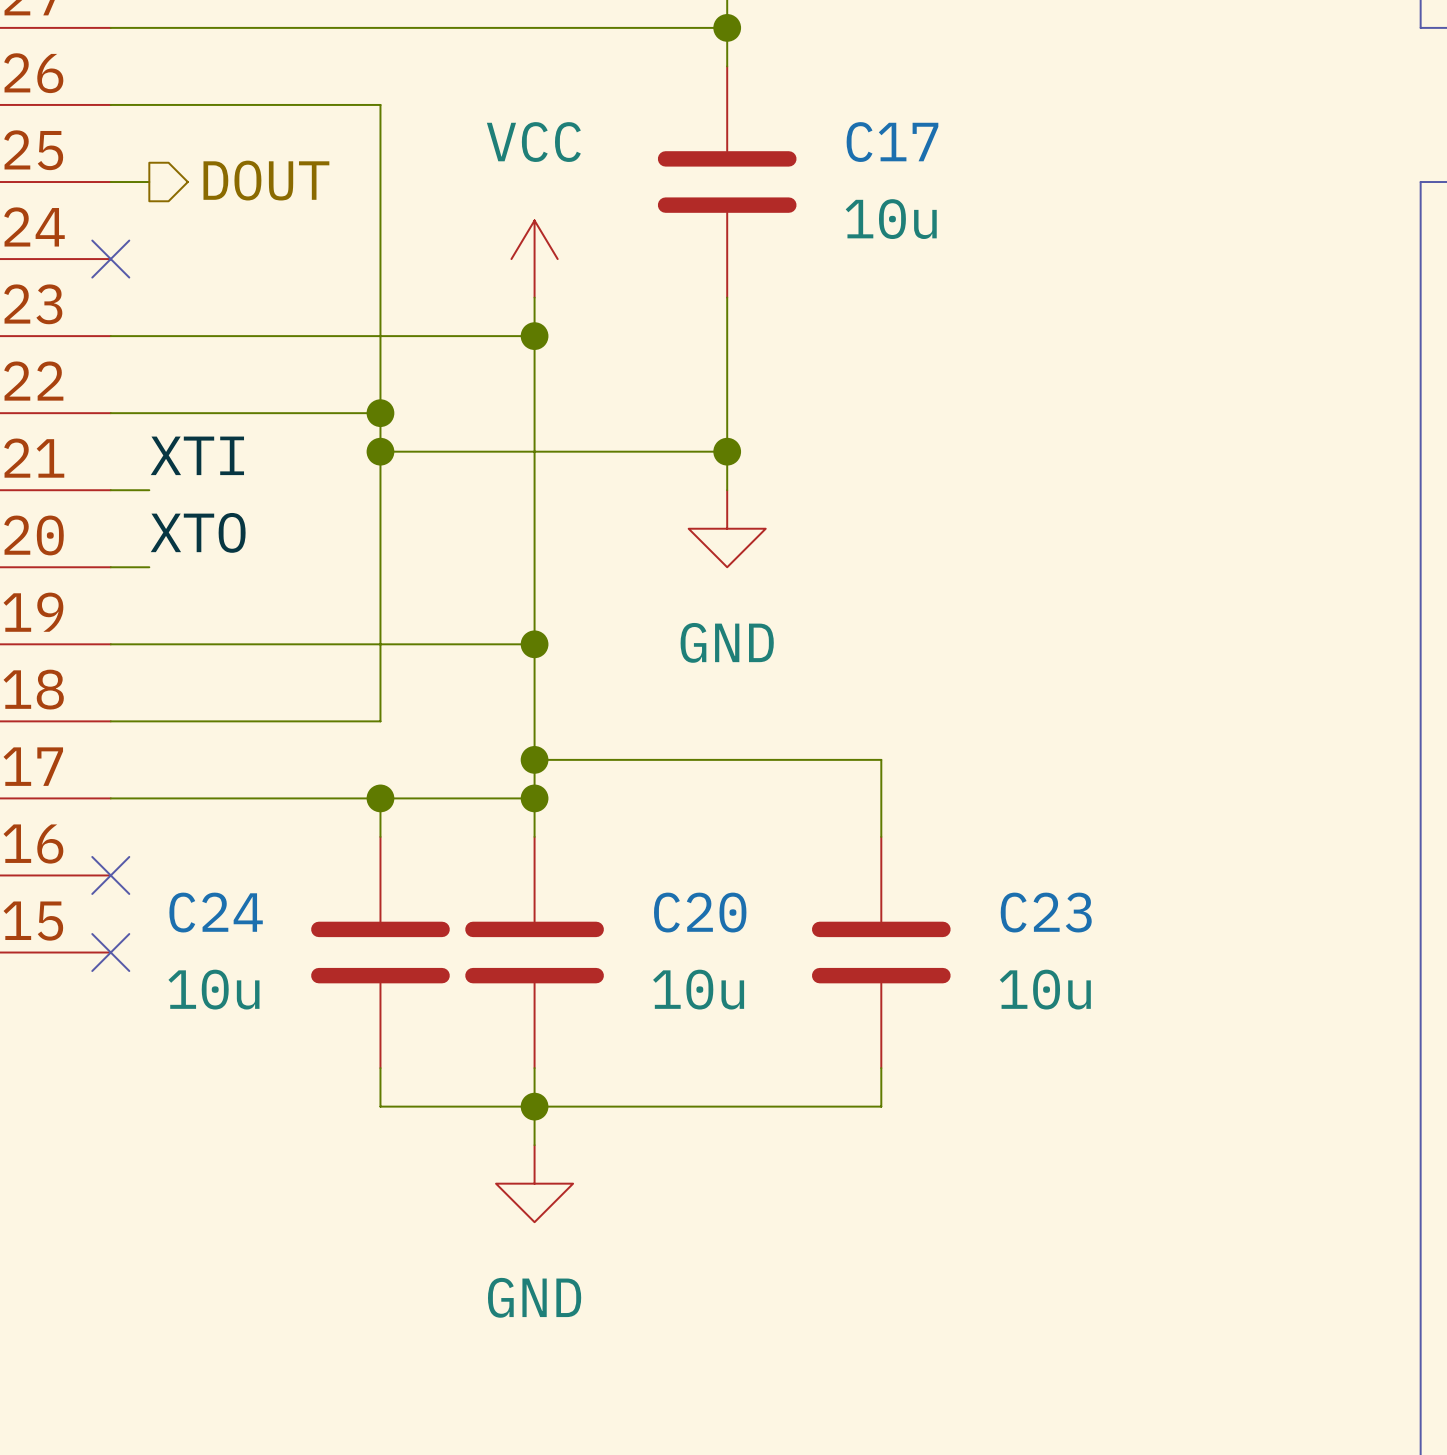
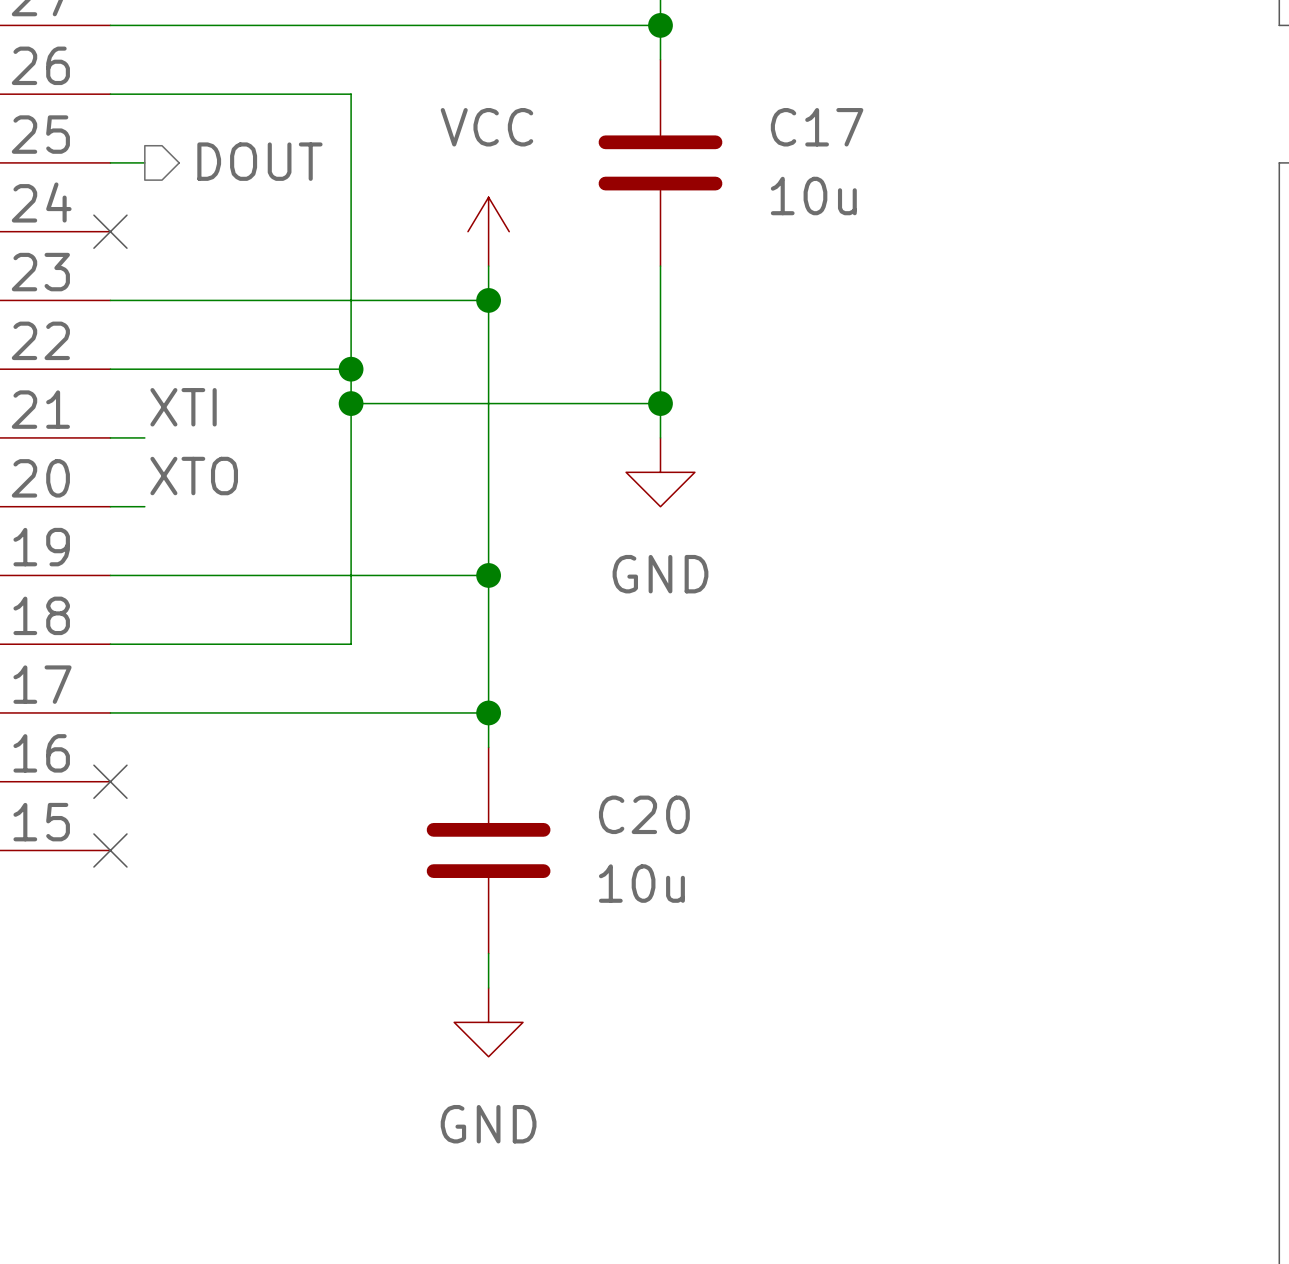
wire: (534, 759) (881, 759) (881, 836) -> none
junction: (534, 759) -> none
wire: (380, 798) (380, 836) -> none
junction: (380, 798) -> none
C24: 10u (380, 952) -> none
C23: 10u (881, 952) -> none
wire: (380, 1068) (380, 1106) (881, 1106) (881, 1068) -> none
junction: (534, 1106) -> none
power symbol position: GND (534, 1183) -> GND (488, 1022)

